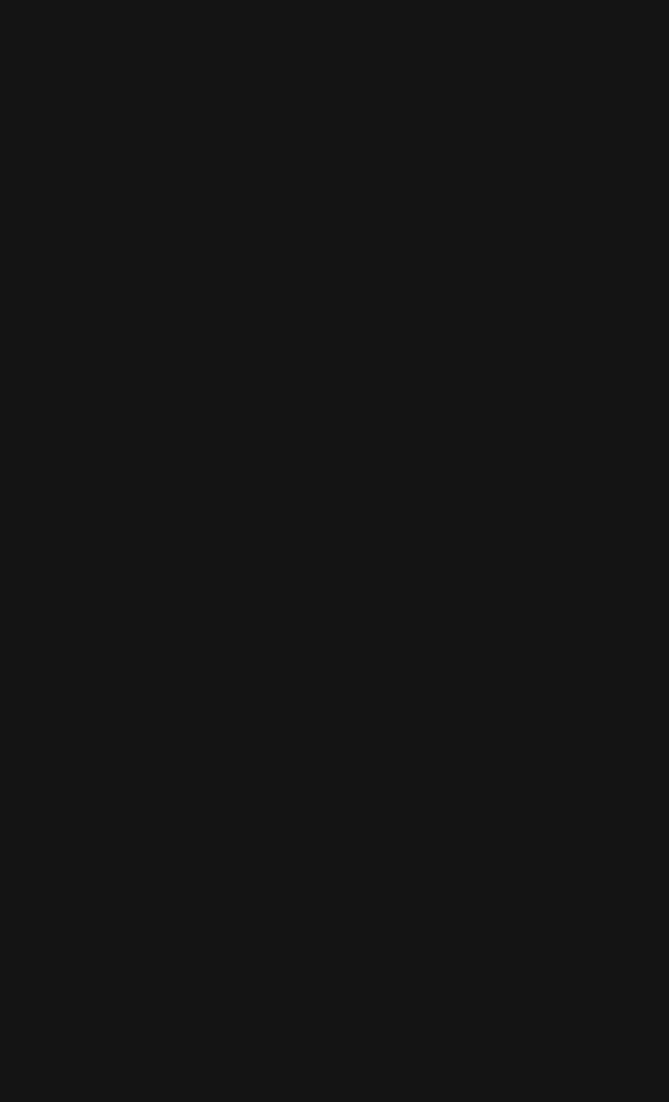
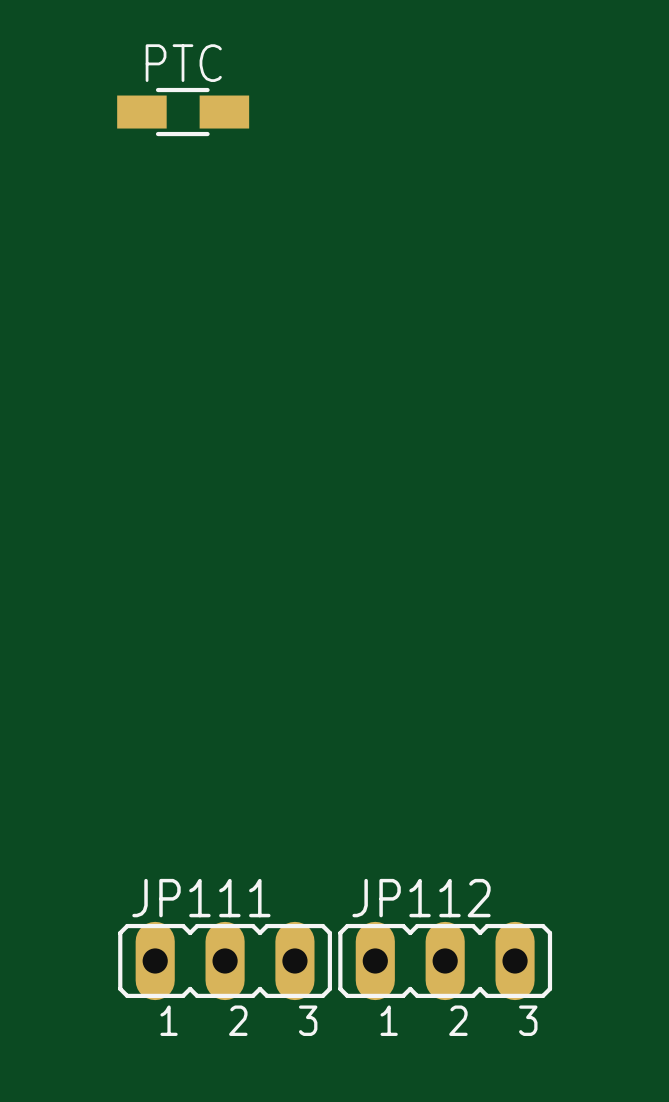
PTC: none -> (183, 112)
JP111: none -> (225, 960)
JP112: none -> (445, 960)

